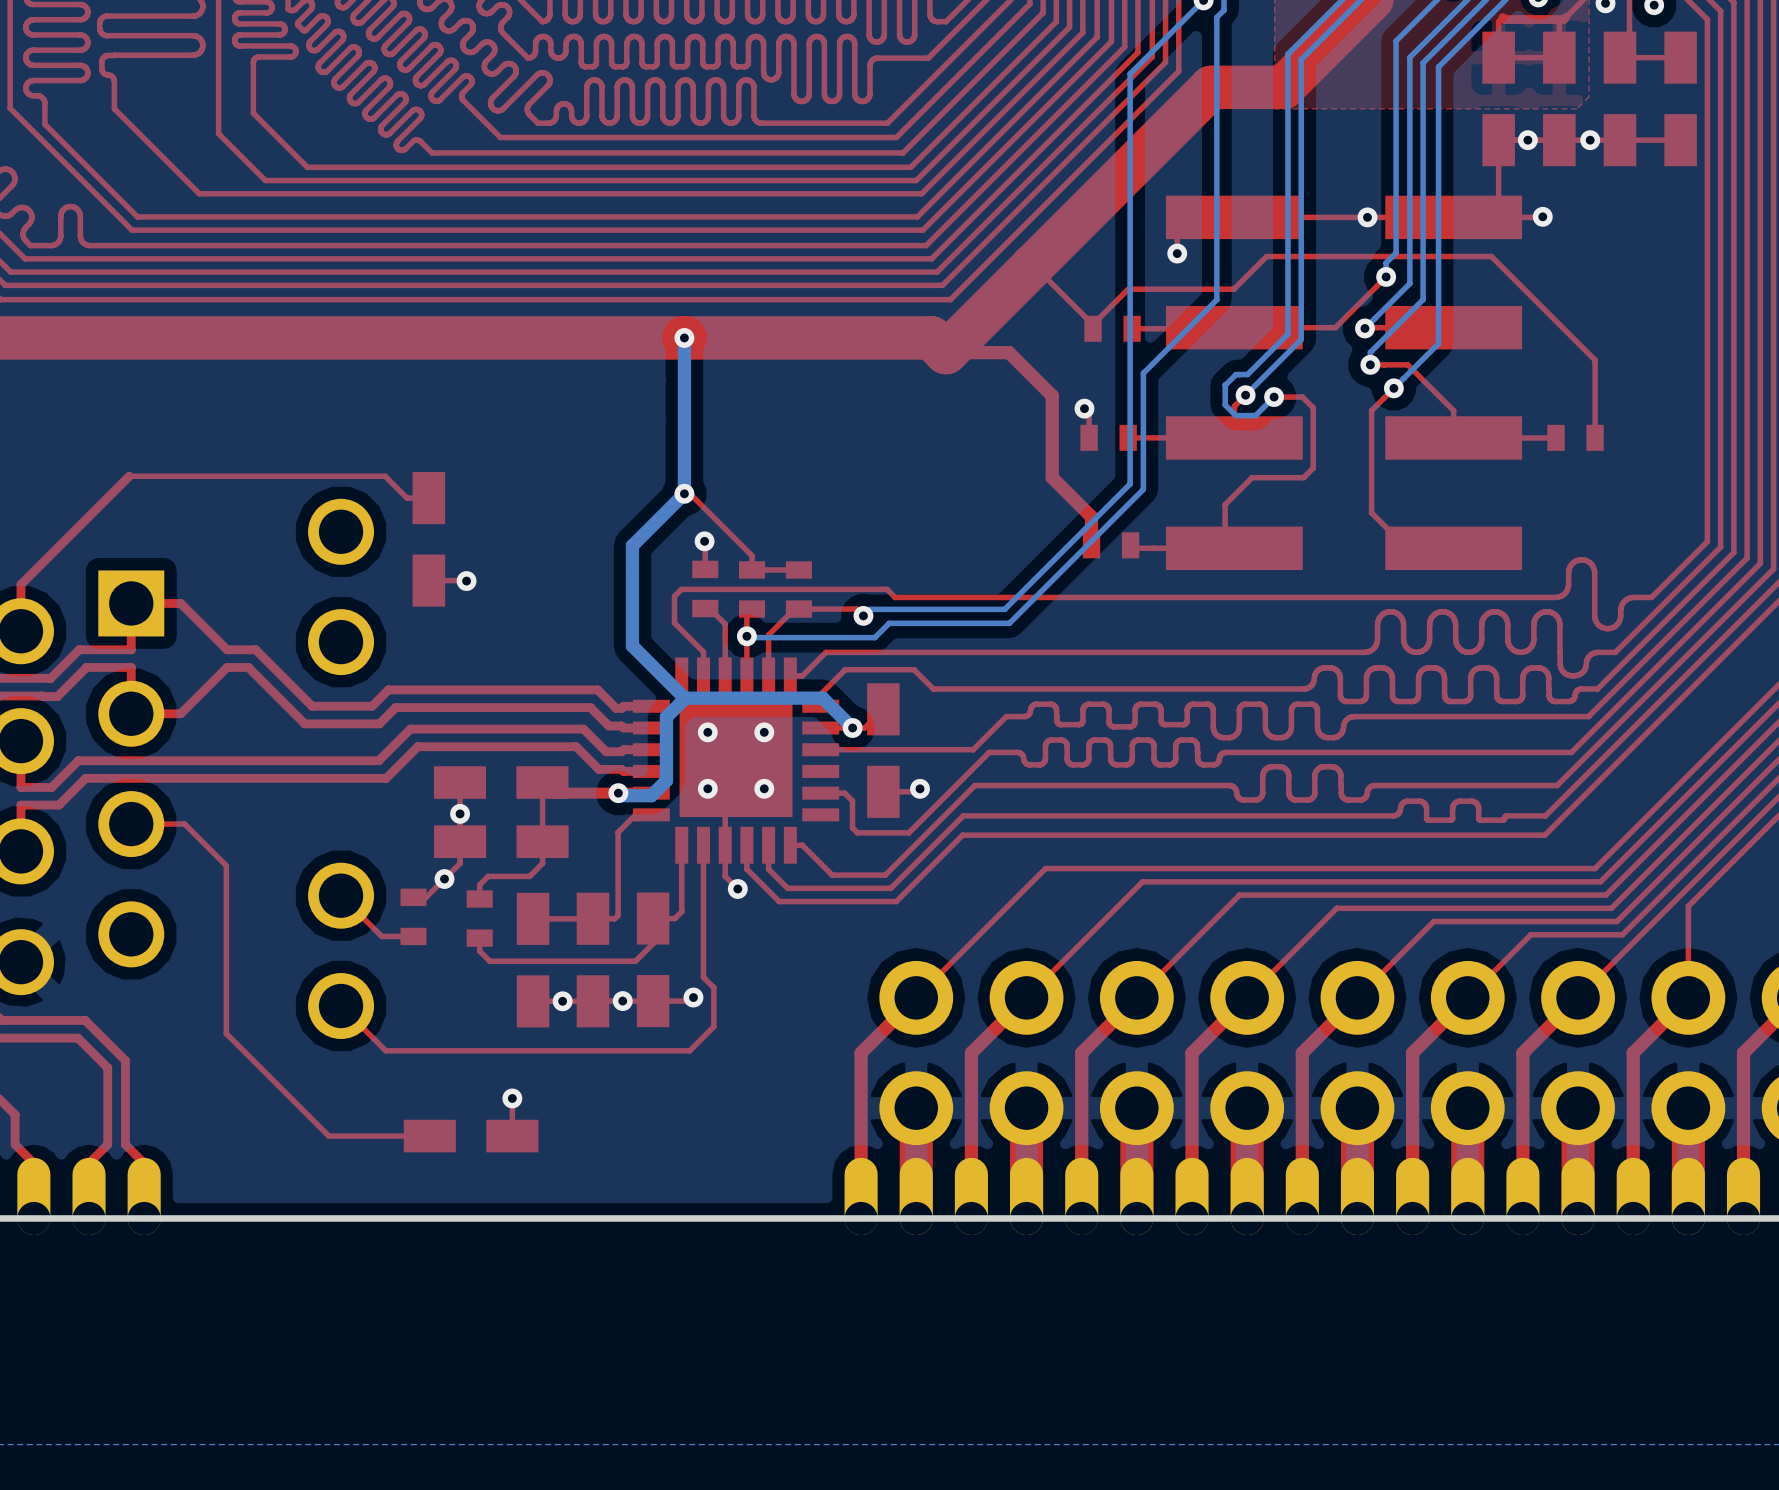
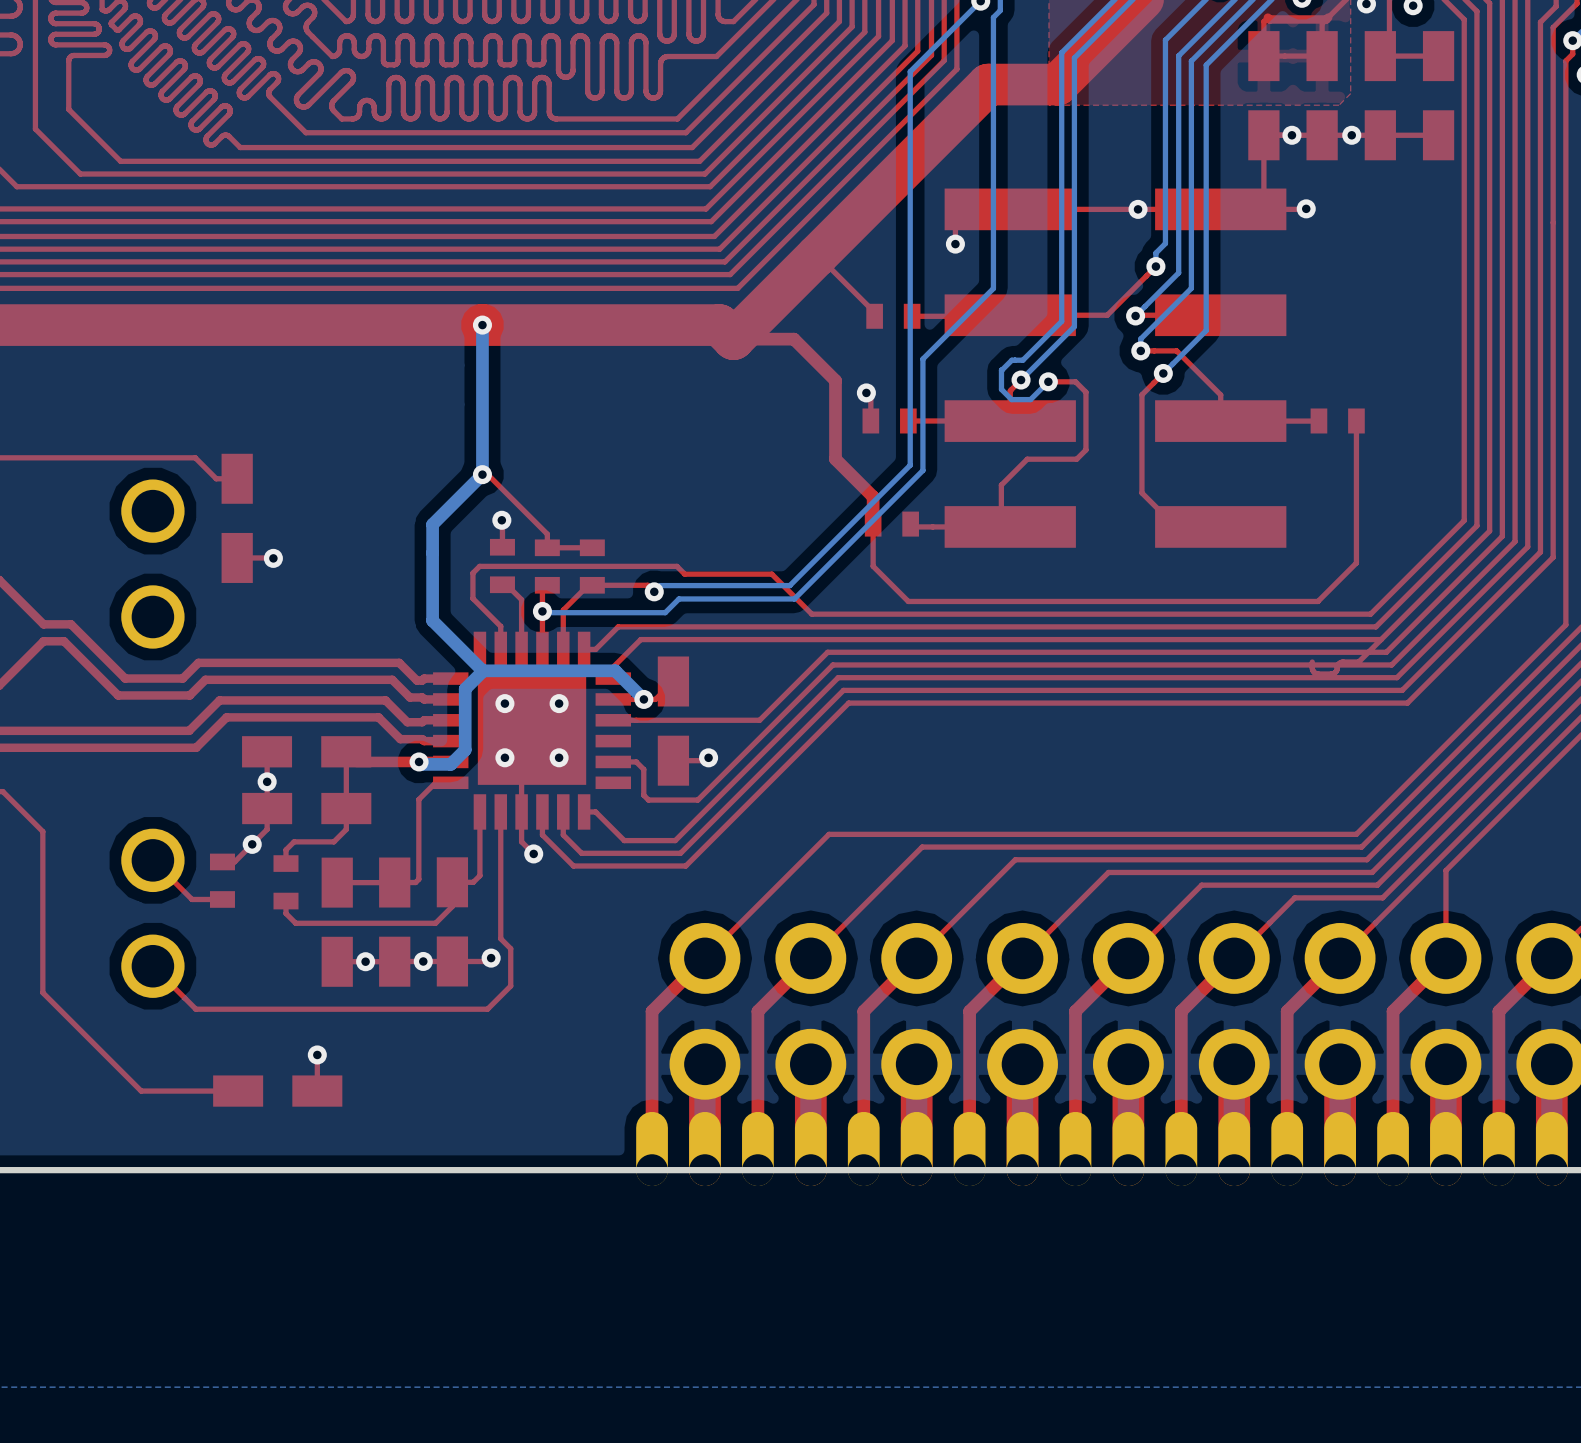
top track: (1093, 324) (1128, 289) (1233, 289) (1266, 256) (1491, 256) (1595, 360) (1595, 437) -> (873, 524) (873, 566) (908, 601) (1317, 601) (1356, 563) (1356, 420)
top track: (1651, 597) (1628, 598) (1622, 604) (1617, 623) (1610, 628) (1602, 627) (1595, 618) (1594, 569) (1589, 562) (1581, 559) (1576, 561) (1569, 567) (1568, 587) (1565, 592) (1555, 597) (985, 597) -> (1410, 574) (1370, 614) (811, 614) (771, 574)
top track: (1559, 652) (1559, 621) (1555, 614) (1546, 611) (1541, 612) (1535, 619) (1533, 642) (1531, 647) (1523, 652) (1517, 652) (1510, 647) (1508, 642) (1506, 619) (1500, 612) (1494, 611) (1489, 612) (1483, 619) (1481, 642) (1474, 651) (1465, 652) (1458, 647) (1456, 642) (1454, 619) (1448, 612) (1442, 611) (1437, 612) (1430, 619) (1429, 642) (1426, 647) (1419, 652) (1413, 652) (1406, 647) (1403, 642) (1402, 619) (1396, 612) (1390, 611) (1384, 612) (1378, 619) (1377, 642) (1374, 647) (1364, 652) -> (1359, 626) (1135, 626)
top track: (1597, 652) (1588, 656) (1583, 671) (1574, 675) (1566, 674) (1561, 669) (1560, 652) -> none
top track: (845, 669) (914, 669) (933, 689) (1303, 689) (1312, 685) (1318, 670) (1329, 667) (1334, 668) (1339, 673) (1341, 699) (1345, 701) (1360, 701) (1366, 696) (1366, 678) (1368, 671) (1374, 668) (1381, 667) (1386, 668) (1391, 673) (1393, 699) (1397, 701) (1412, 701) (1418, 696) (1418, 678) (1420, 671) (1426, 668) (1433, 667) (1438, 668) (1443, 673) (1445, 699) (1449, 701) (1464, 701) (1470, 696) (1470, 678) (1472, 671) (1478, 668) (1486, 667) (1490, 668) (1495, 673) (1498, 699) (1501, 701) (1516, 701) (1522, 696) (1522, 678) (1525, 671) (1530, 668) (1538, 667) (1542, 668) (1547, 673) (1548, 689) -> (636, 643) (640, 639) (1381, 639)
top track: (1626, 678) (1588, 716) (1354, 716) (1345, 720) (1341, 733) (1332, 737) (1325, 737) (1319, 733) (1317, 727) (1317, 709) (1311, 704) (1296, 704) (1292, 706) (1290, 731) (1287, 735) (1280, 737) (1273, 737) (1267, 733) (1265, 727) (1265, 709) (1259, 704) (1244, 704) (1240, 706) (1238, 731) (1235, 735) (1228, 737) (1219, 736) (1214, 731) (1213, 709) (1208, 704) (1189, 705) (1187, 709) (1187, 721) (1183, 724) (1162, 723) (1160, 707) (1154, 704) (1137, 705) (1135, 709) (1134, 722) (1131, 726) (1110, 725) (1108, 709) (1104, 704) (1085, 705) (1083, 709) (1082, 721) (1079, 724) (1060, 724) (1057, 722) (1056, 716) -> (1386, 652) (827, 652) (791, 688)
top track: (1631, 692) (1571, 752) (1225, 752) (1220, 754) (1218, 762) (1213, 764) (1200, 763) (1197, 752) -> (1391, 664) (832, 664) (775, 722)
top track: (1637, 705) (1557, 785) (1374, 785) (1368, 788) (1363, 799) (1348, 800) (1343, 798) (1341, 794) (1339, 772) (1331, 766) (1322, 766) (1316, 770) (1314, 776) (1314, 794) (1312, 798) (1307, 800) (1294, 799) (1290, 797) (1287, 772) (1279, 766) (1270, 766) (1264, 770) (1262, 776) (1262, 794) (1260, 798) (1255, 800) (1240, 799) (1235, 788) (1229, 785) (974, 785) -> (1396, 677) (838, 677) (761, 754)
top track: (1056, 716) (1056, 707) (1050, 704) (1034, 704) (1029, 714) (1025, 716) (1006, 716) -> none
top track: (1642, 718) (1545, 815) (1506, 815) -> none
top track: (1648, 731) (1544, 835) (962, 835) -> (1407, 703) (848, 703) (749, 802)
top track: (1197, 752) (1195, 741) (1179, 740) (1175, 744) (1175, 761) (1169, 764) (1158, 764) (1155, 762) (1153, 744) (1147, 740) (1137, 740) (1133, 742) (1132, 760) (1126, 764) (1115, 764) (1111, 762) (1110, 744) (1104, 740) (1093, 740) (1090, 742) (1088, 760) (1082, 764) (1071, 764) (1068, 762) (1067, 744) (1062, 740) (1050, 740) (1046, 742) (1045, 760) (1040, 764) (1027, 764) (1022, 754) (1018, 752) (989, 752) -> none
top track: (963, 815) (1393, 815) (1398, 813) (1404, 801) (1419, 801) (1425, 805) (1426, 818) -> (750, 783) (843, 690) (1402, 690)
top track: (1478, 818) (1477, 805) (1471, 801) (1455, 802) (1452, 806) (1452, 818) -> none
top track: (1450, 820) (1428, 820) -> none
top track: (1502, 820) (1480, 820) -> none

